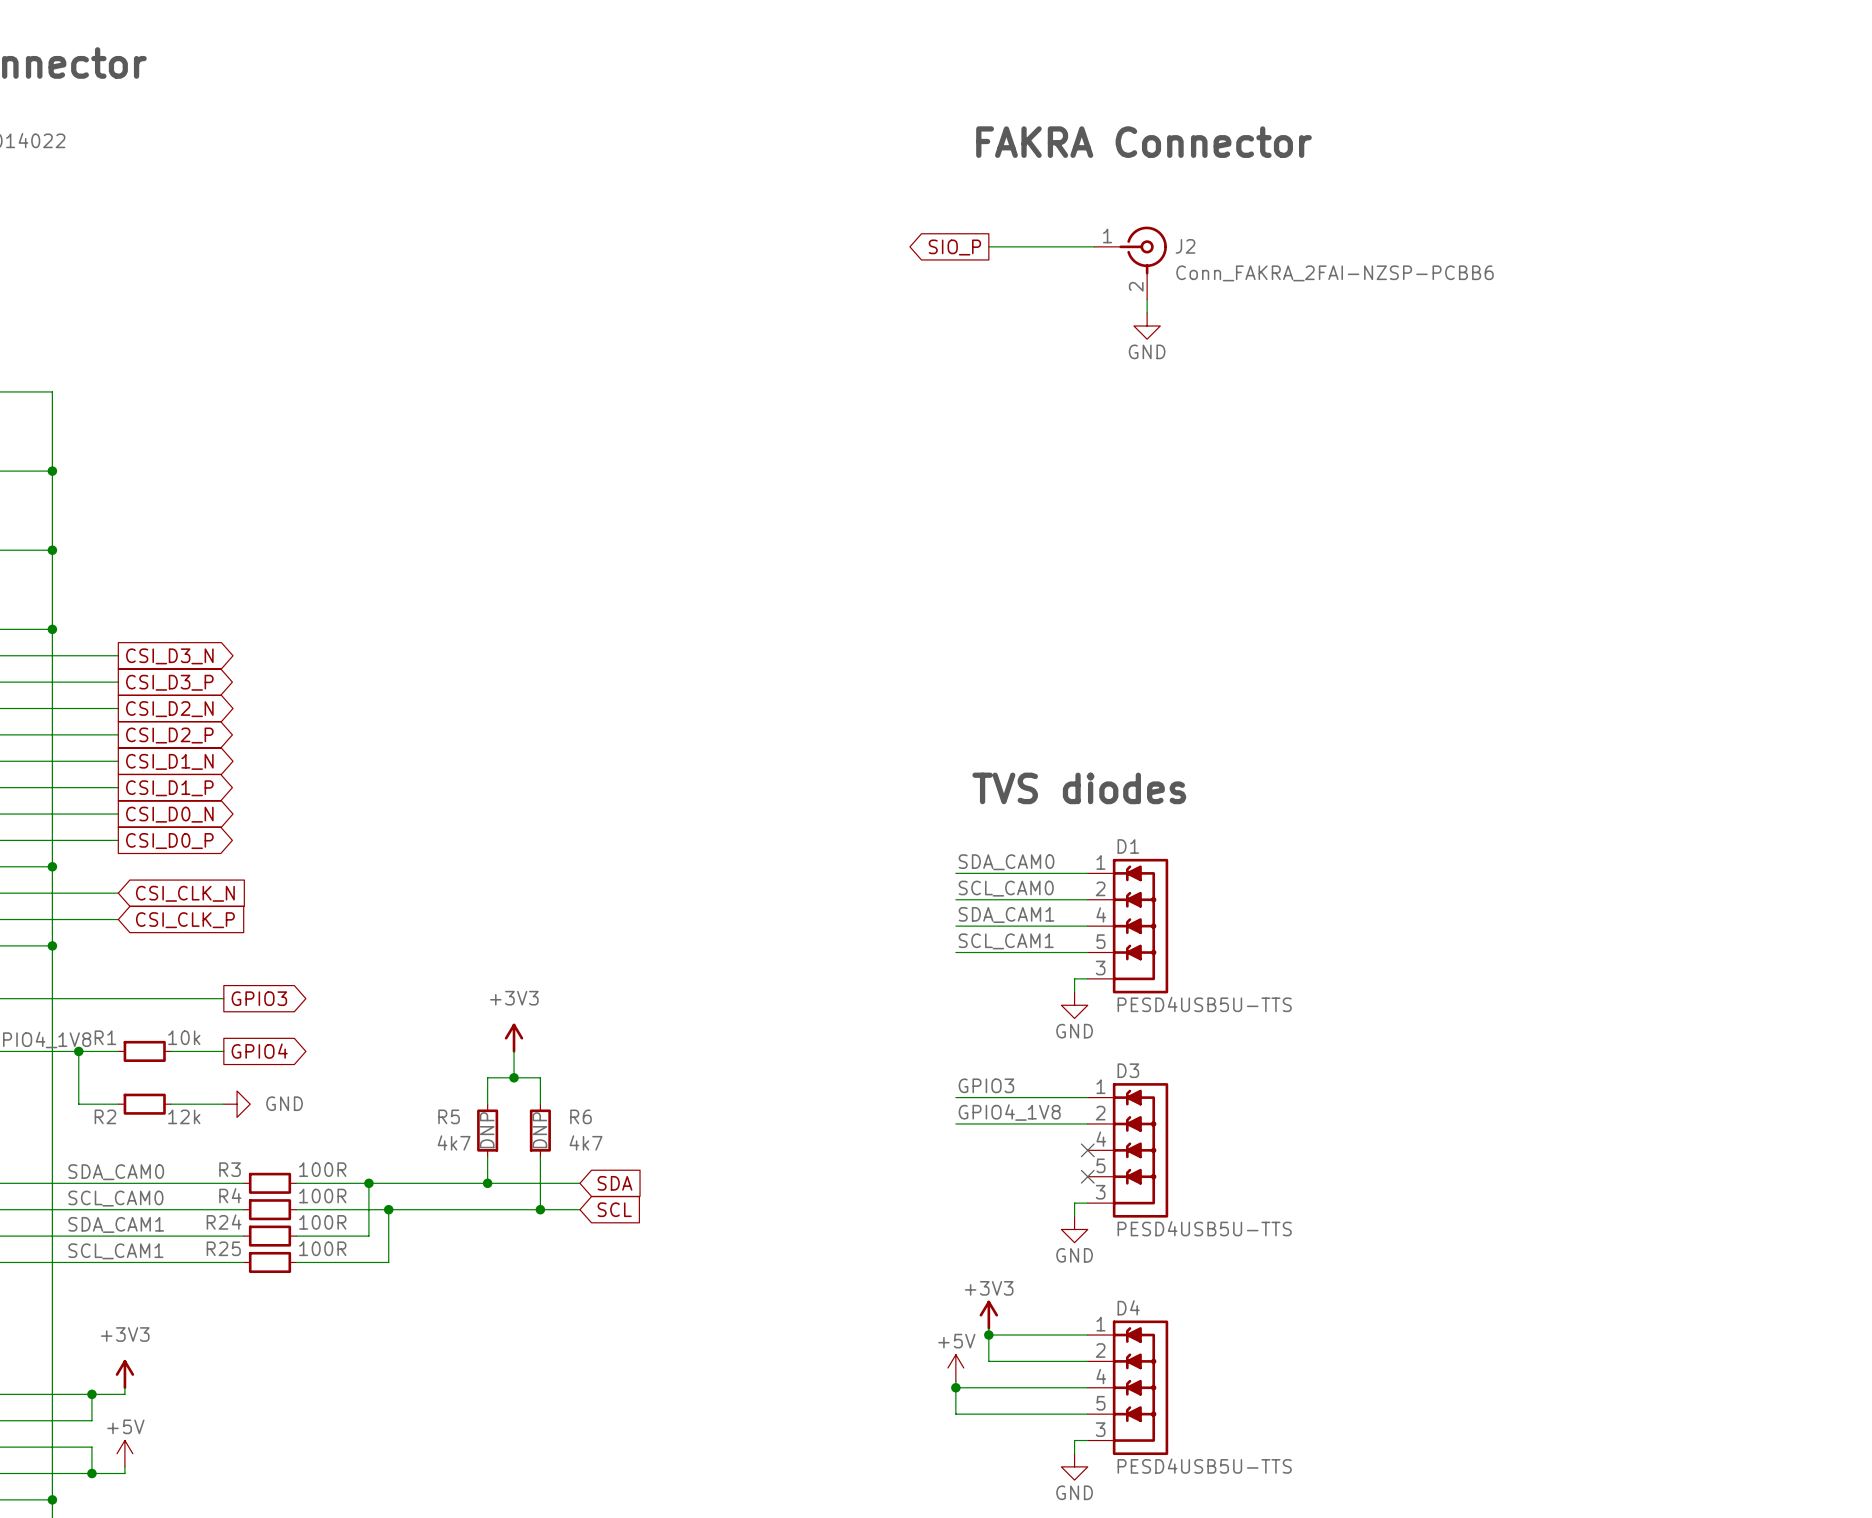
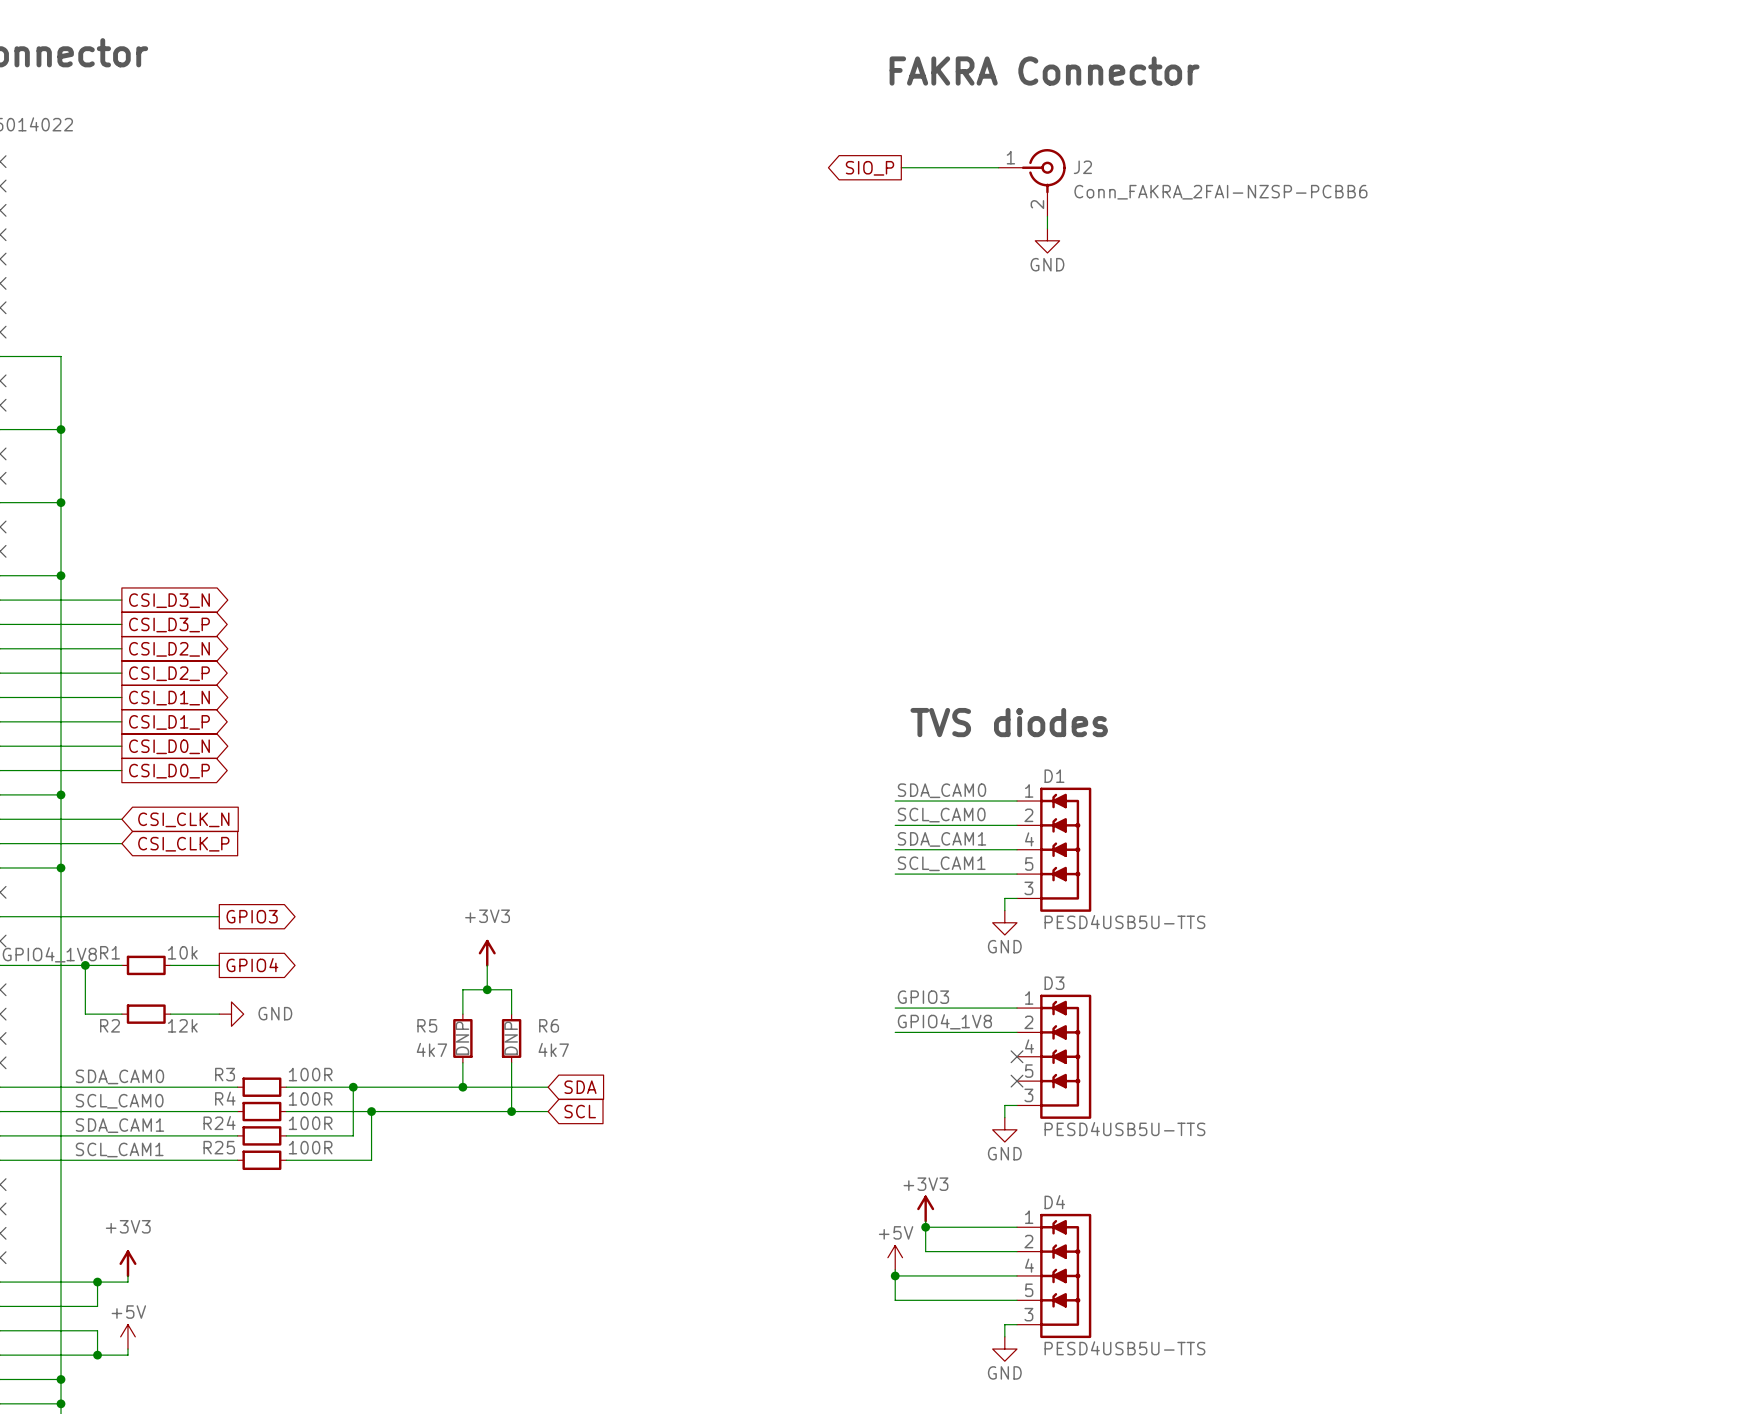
text position: FAKRA Connector (1143, 142) -> FAKRA Connector (1044, 71)
wire: (988, 246) (1094, 246) -> (901, 167) (998, 167)
global label position: SIO_P (954, 247) -> SIO_P (869, 168)
J2 position: (1130, 263) -> (1032, 182)
wire: (1147, 299) (1147, 312) -> (1047, 216) (1047, 228)
power symbol position: GND (1147, 326) -> GND (1047, 240)

